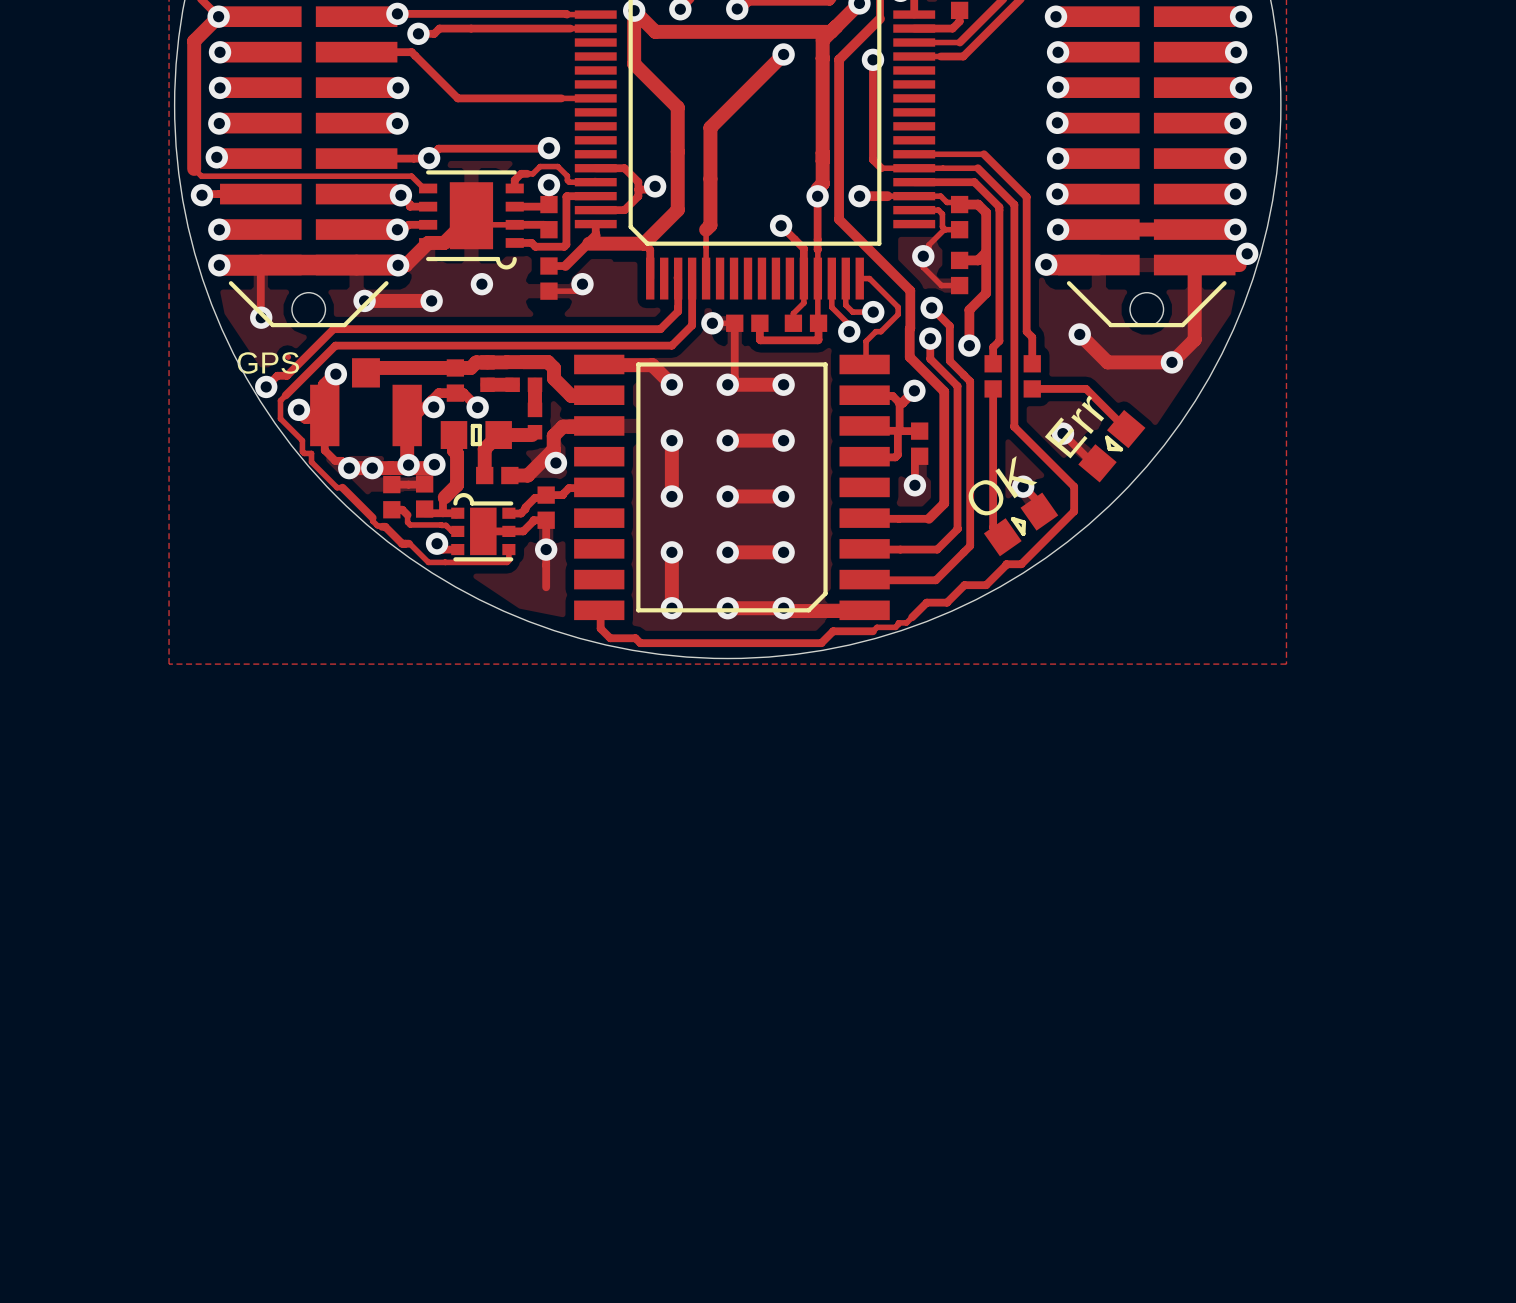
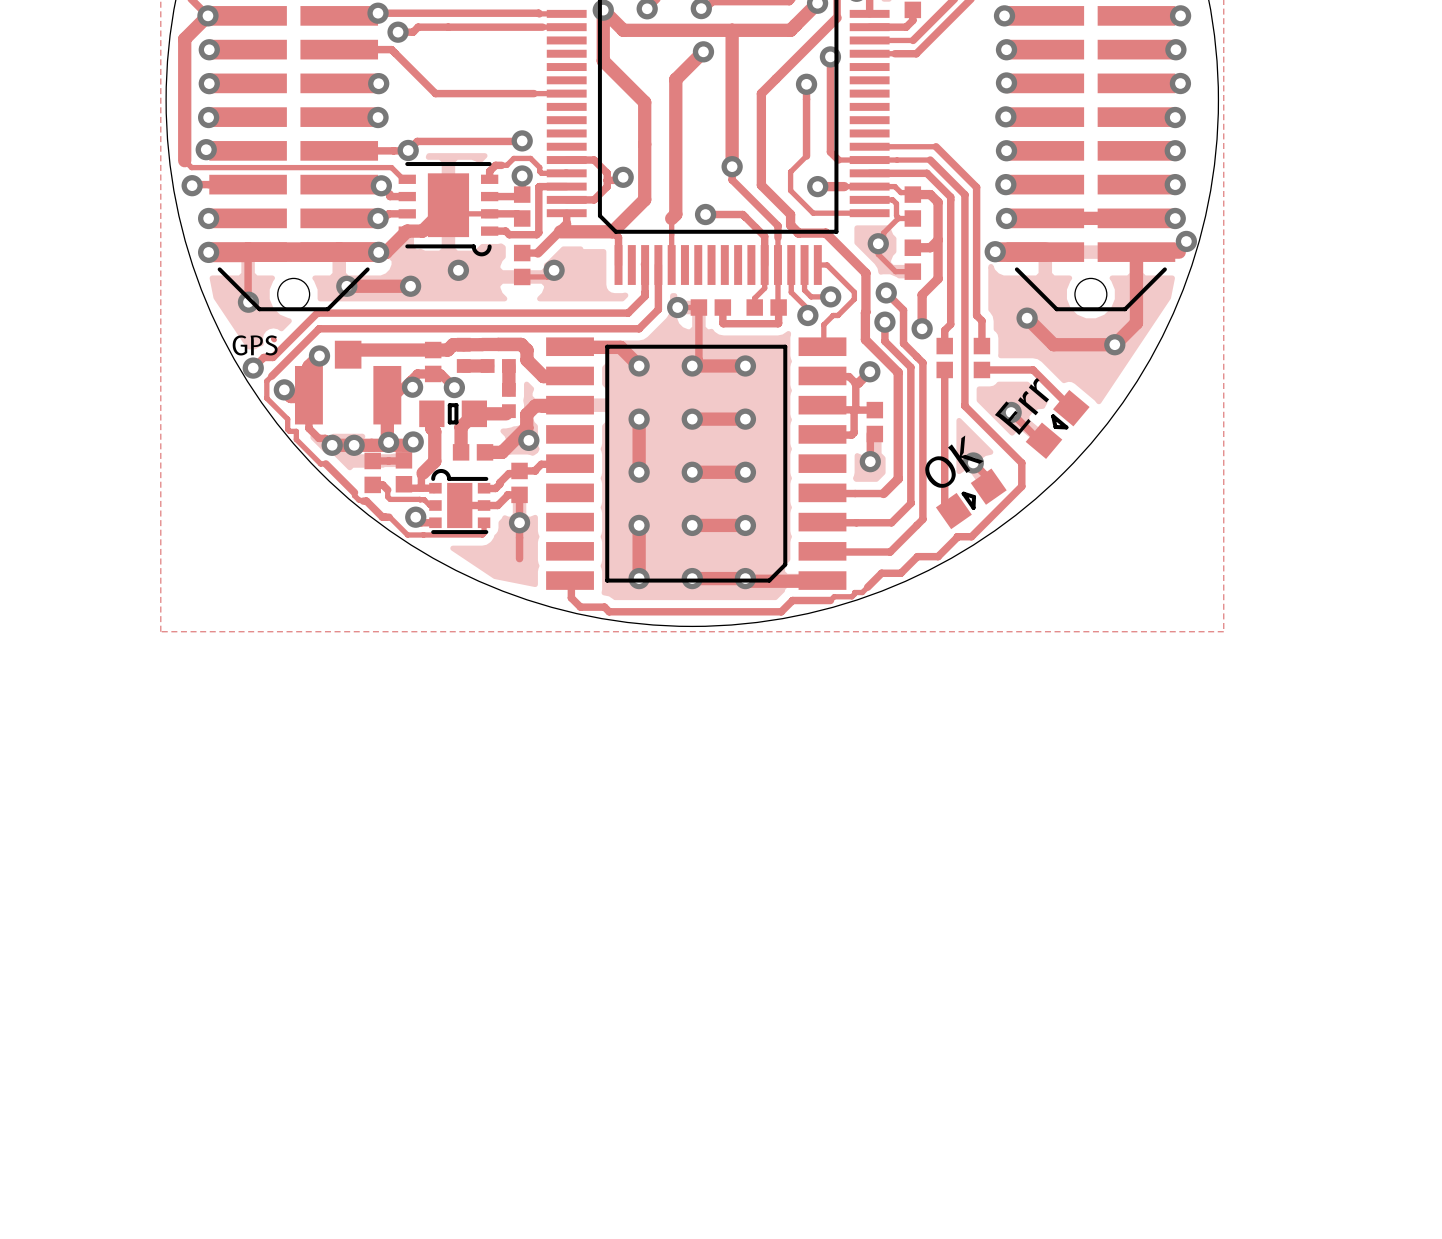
track: (831, 31) (822, 40) (822, 183) (817, 188) (817, 237) -> (732, 30) (732, 179) (777, 225)
via: none -> (703, 51)
track: (783, 54) (710, 127) -> (703, 51) (675, 79) (675, 121)
via: (783, 54) -> none
track: (839, 59) (839, 219) (910, 290) -> (798, 56) (761, 93) (761, 185) (790, 214) (790, 225) (798, 233) (825, 233) (865, 273) (865, 276)
track: none -> (806, 84) (806, 156) (790, 171) (790, 190) (813, 213) (869, 213)
via: none -> (806, 84)
via: none -> (732, 166)
via: (817, 196) -> none
track: none -> (705, 214) (742, 214)
via: none -> (705, 214)
via: (781, 225) -> none

